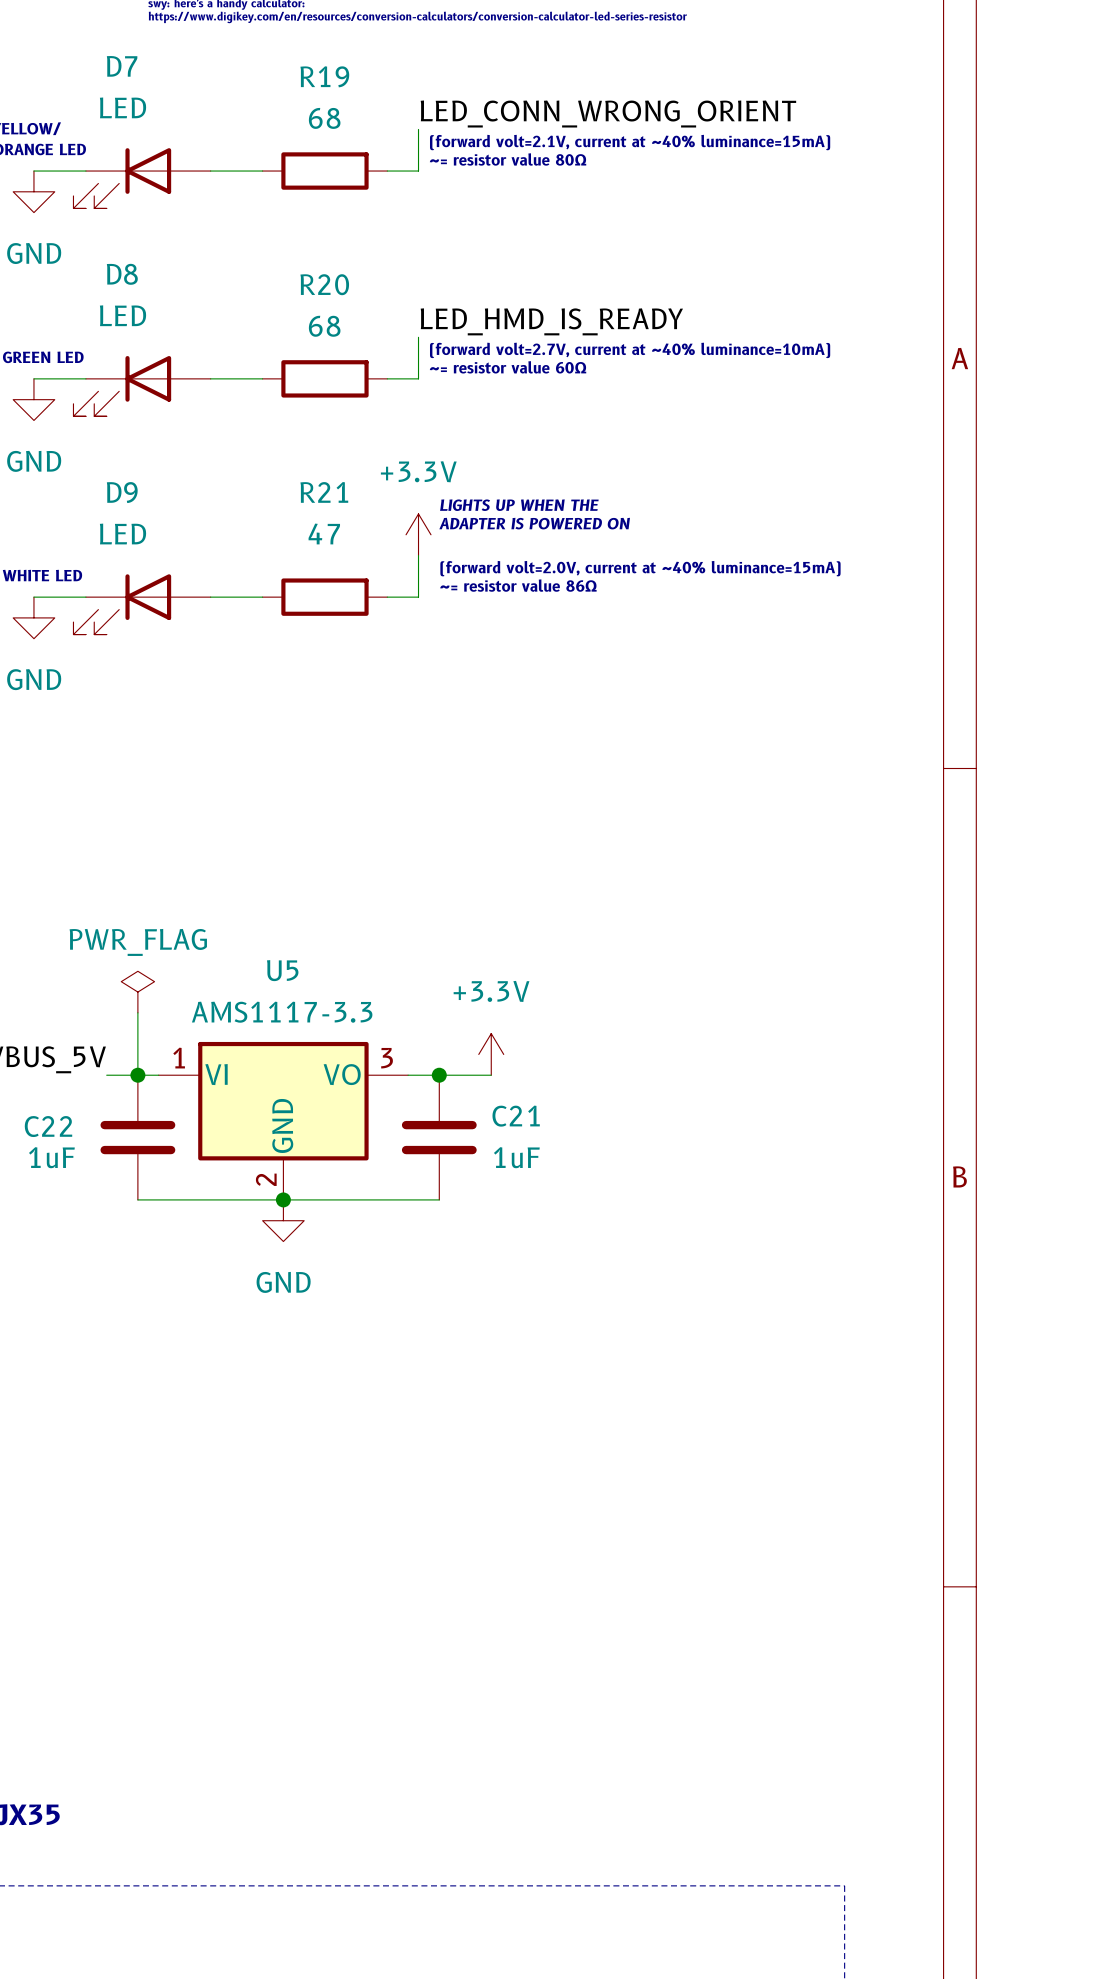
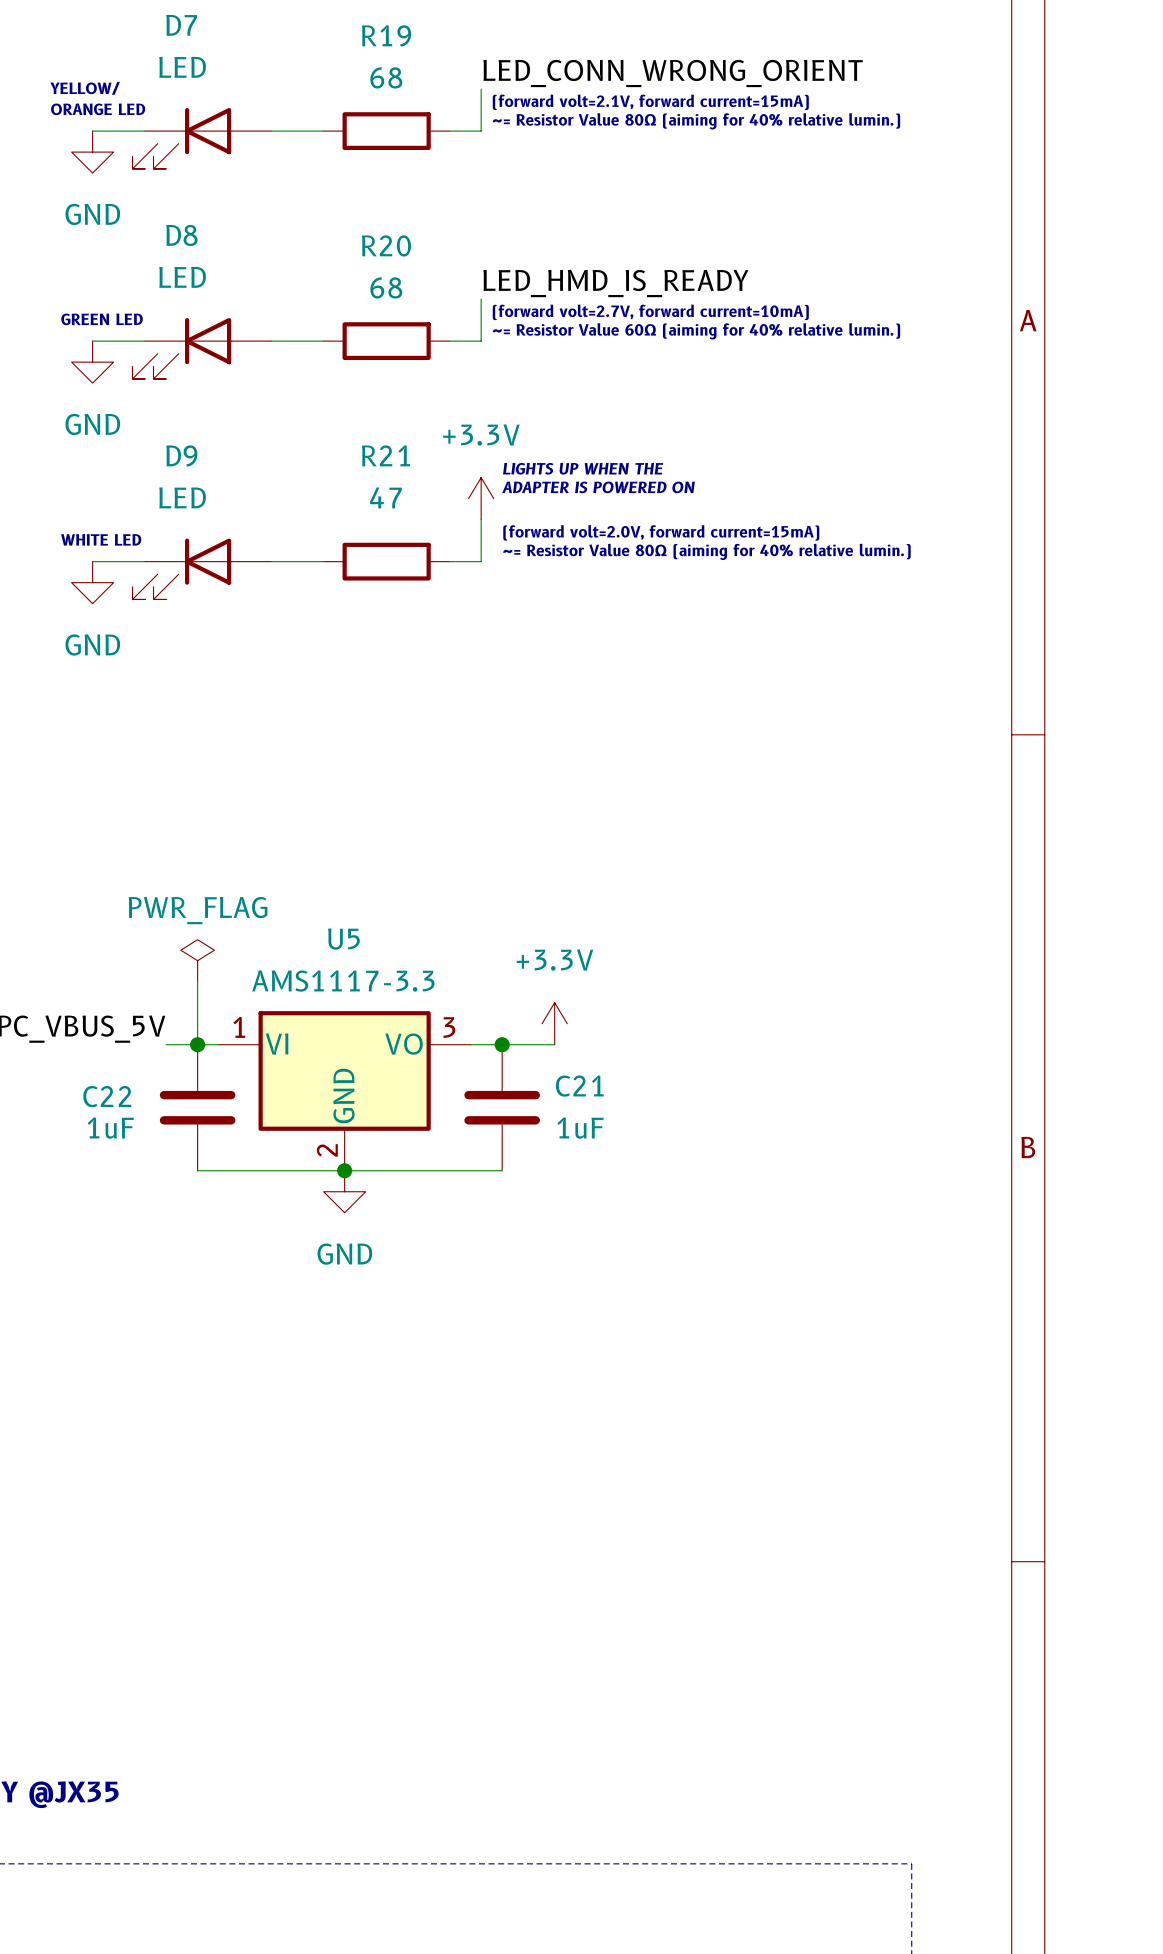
text: (forward volt=2.1V, current at ~40% luminance=15mA) (630, 142) -> (forward volt=2.1V, forward current=15mA) (650, 102)
text: ~= resistor value 80Ω (508, 159) -> ~= Resistor Value 80Ω (aiming for 40% relative lumin.) (696, 121)
text: (forward volt=2.7V, current at ~40% luminance=10mA) (630, 350) -> (forward volt=2.7V, forward current=10mA) (650, 312)
text: ~= resistor value 60Ω (508, 367) -> ~= Resistor Value 60Ω (aiming for 40% relative lumin.) (696, 331)
text: (forward volt=2.0V, current at ~40% luminance=15mA) (640, 568) -> (forward volt=2.0V, forward current=15mA) (661, 532)
text: ~= resistor value 86Ω (518, 585) -> ~= Resistor Value 80Ω (aiming for 40% relative lumin.) (706, 551)

